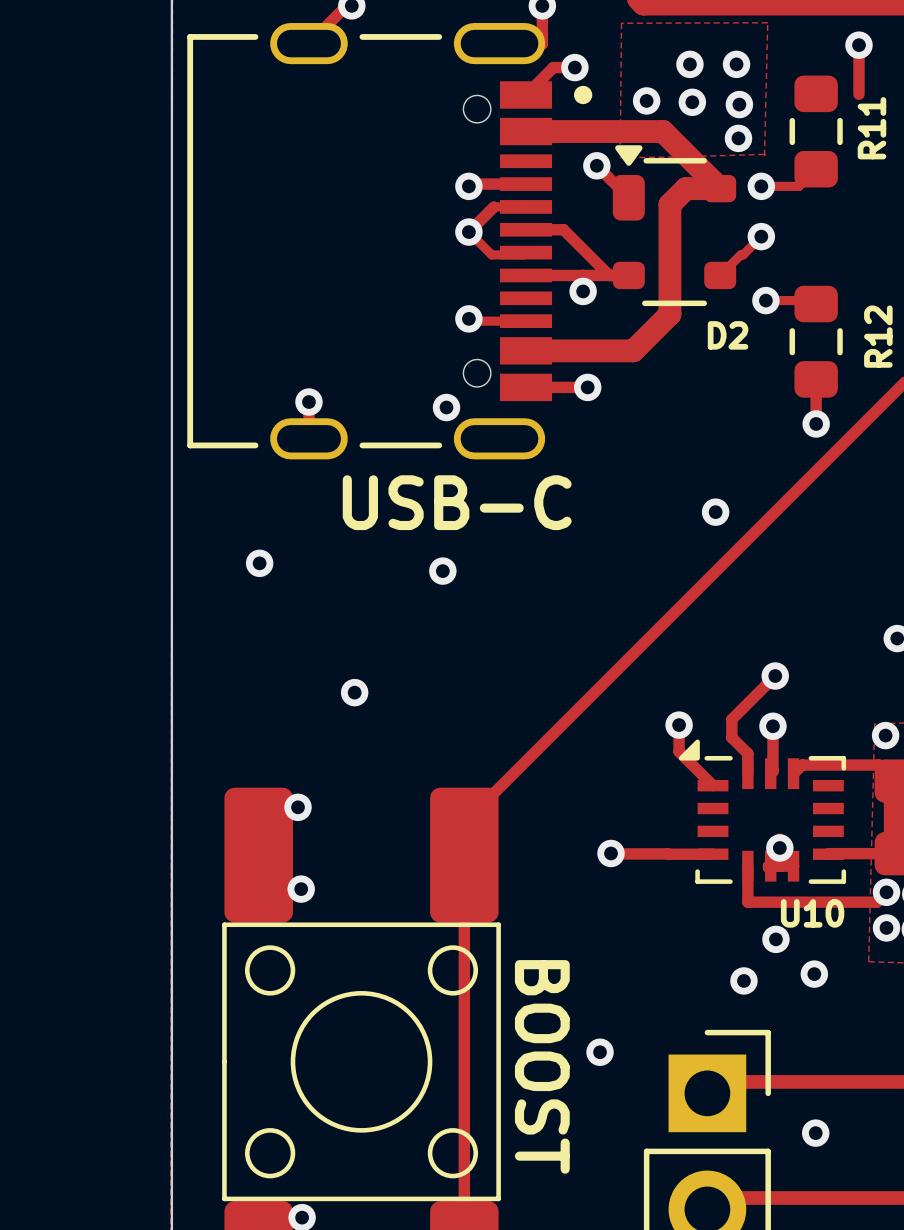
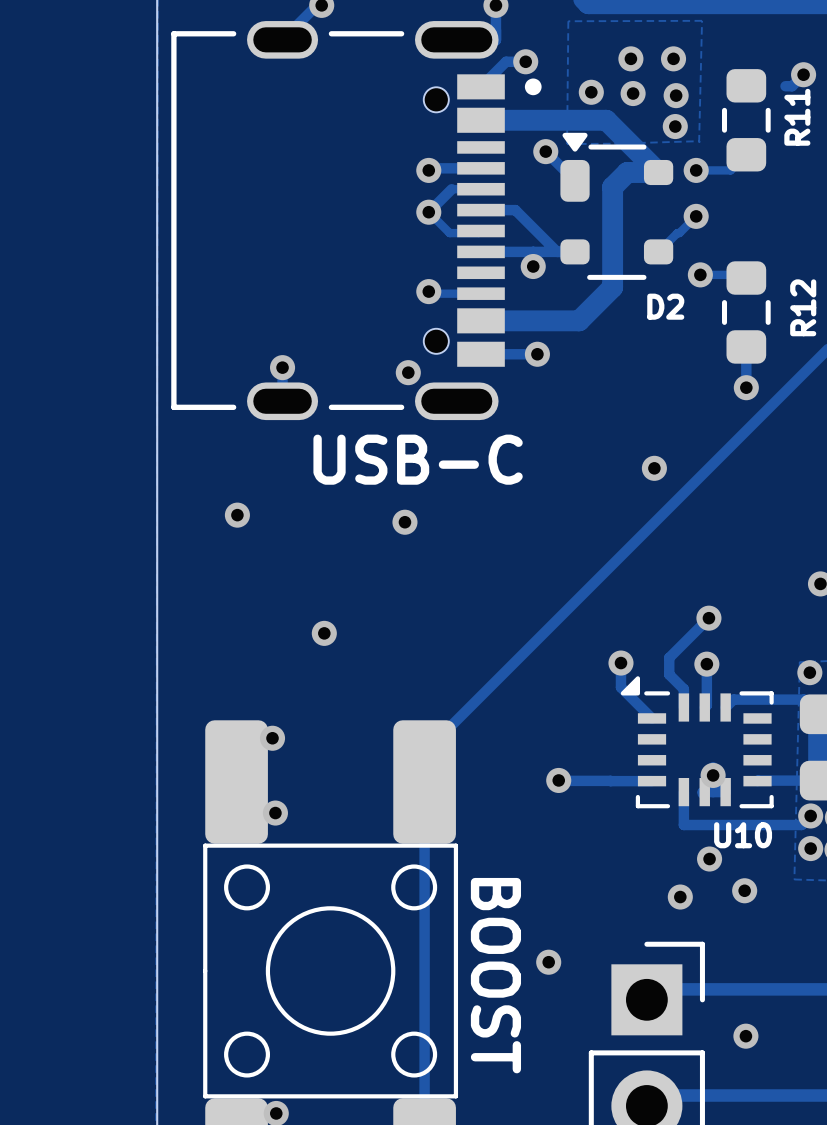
track: (859, 45) (859, 94) -> (803, 74) (792, 86) (785, 86)
via position: (859, 45) -> (803, 74)

